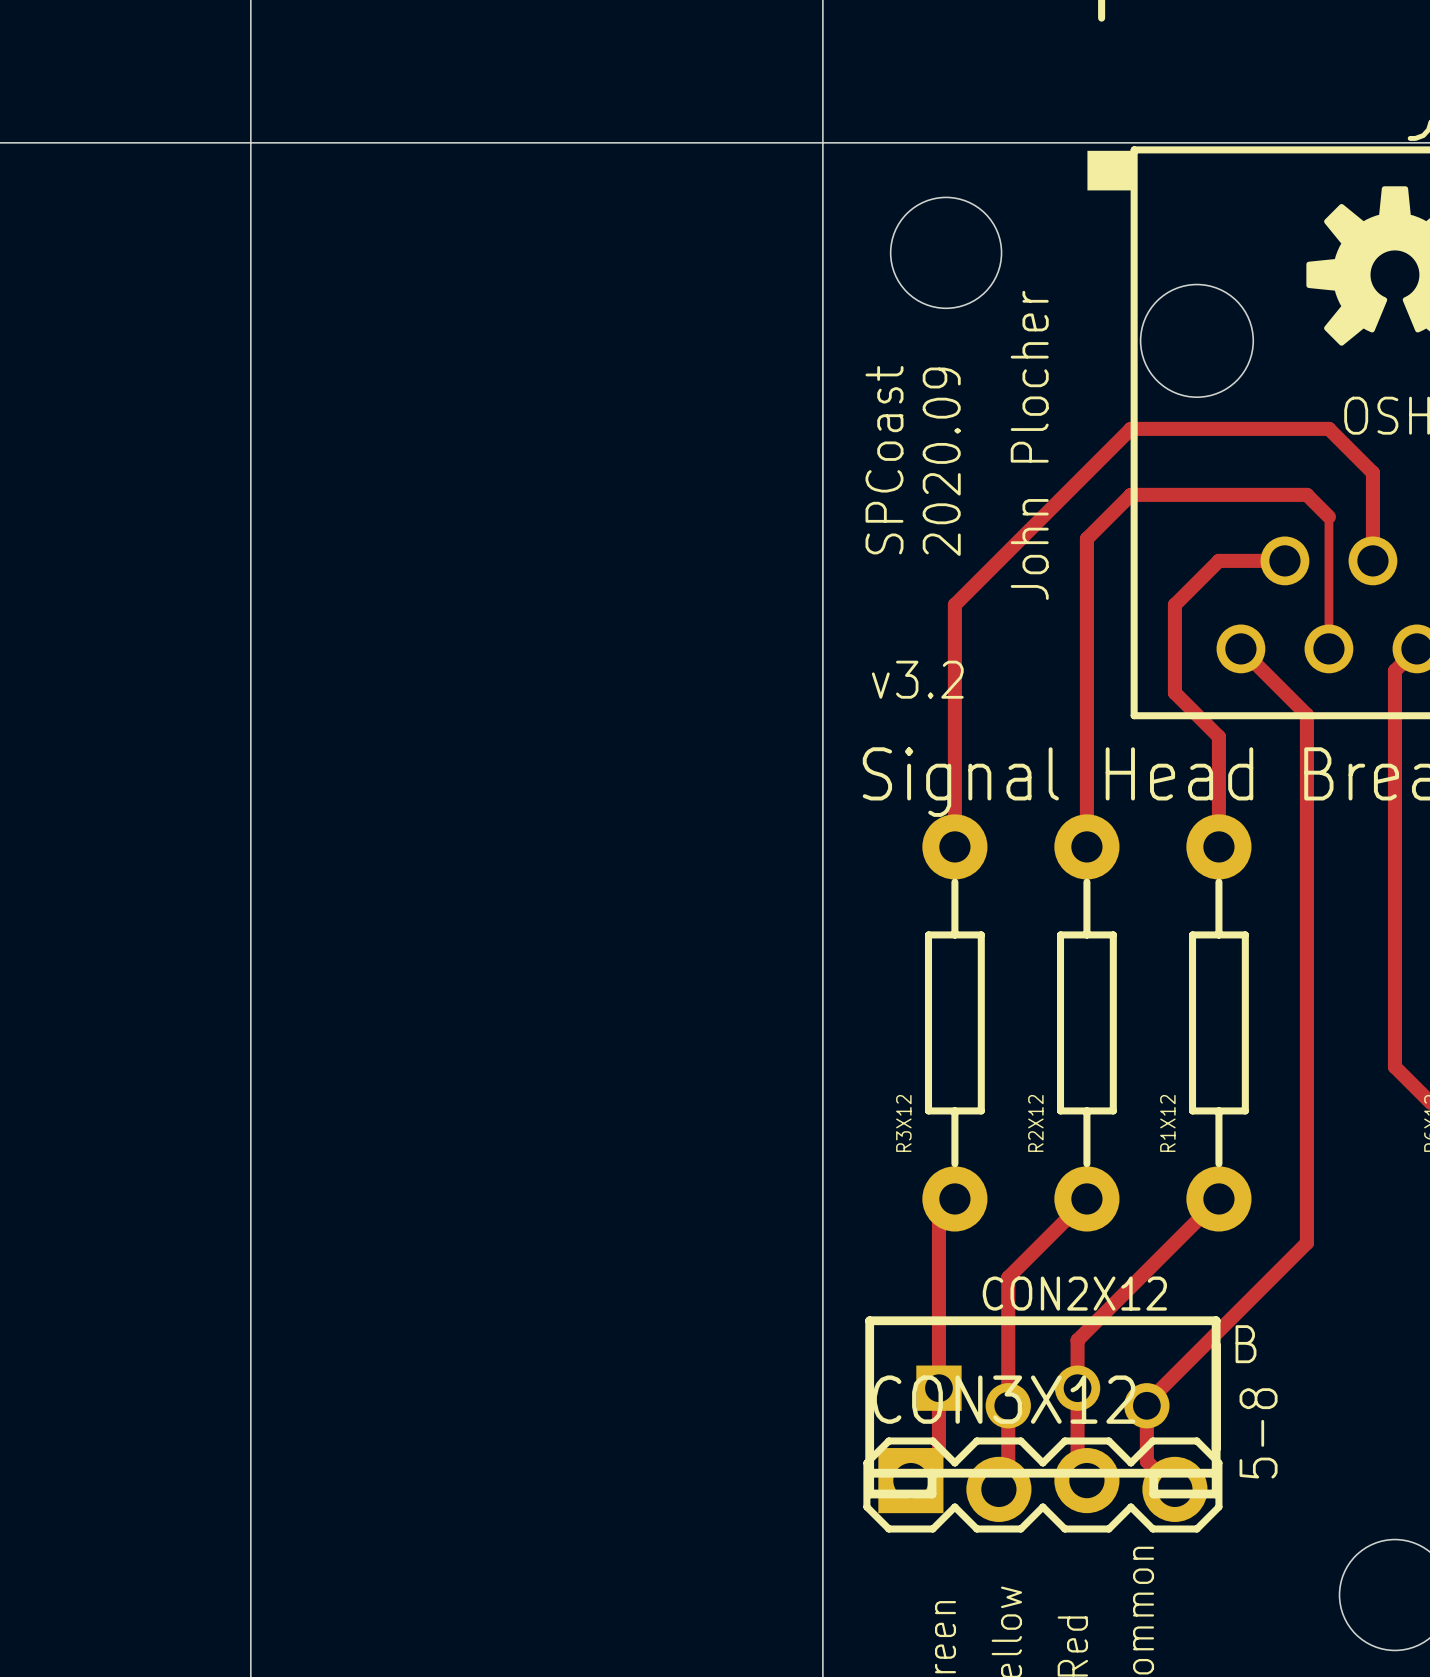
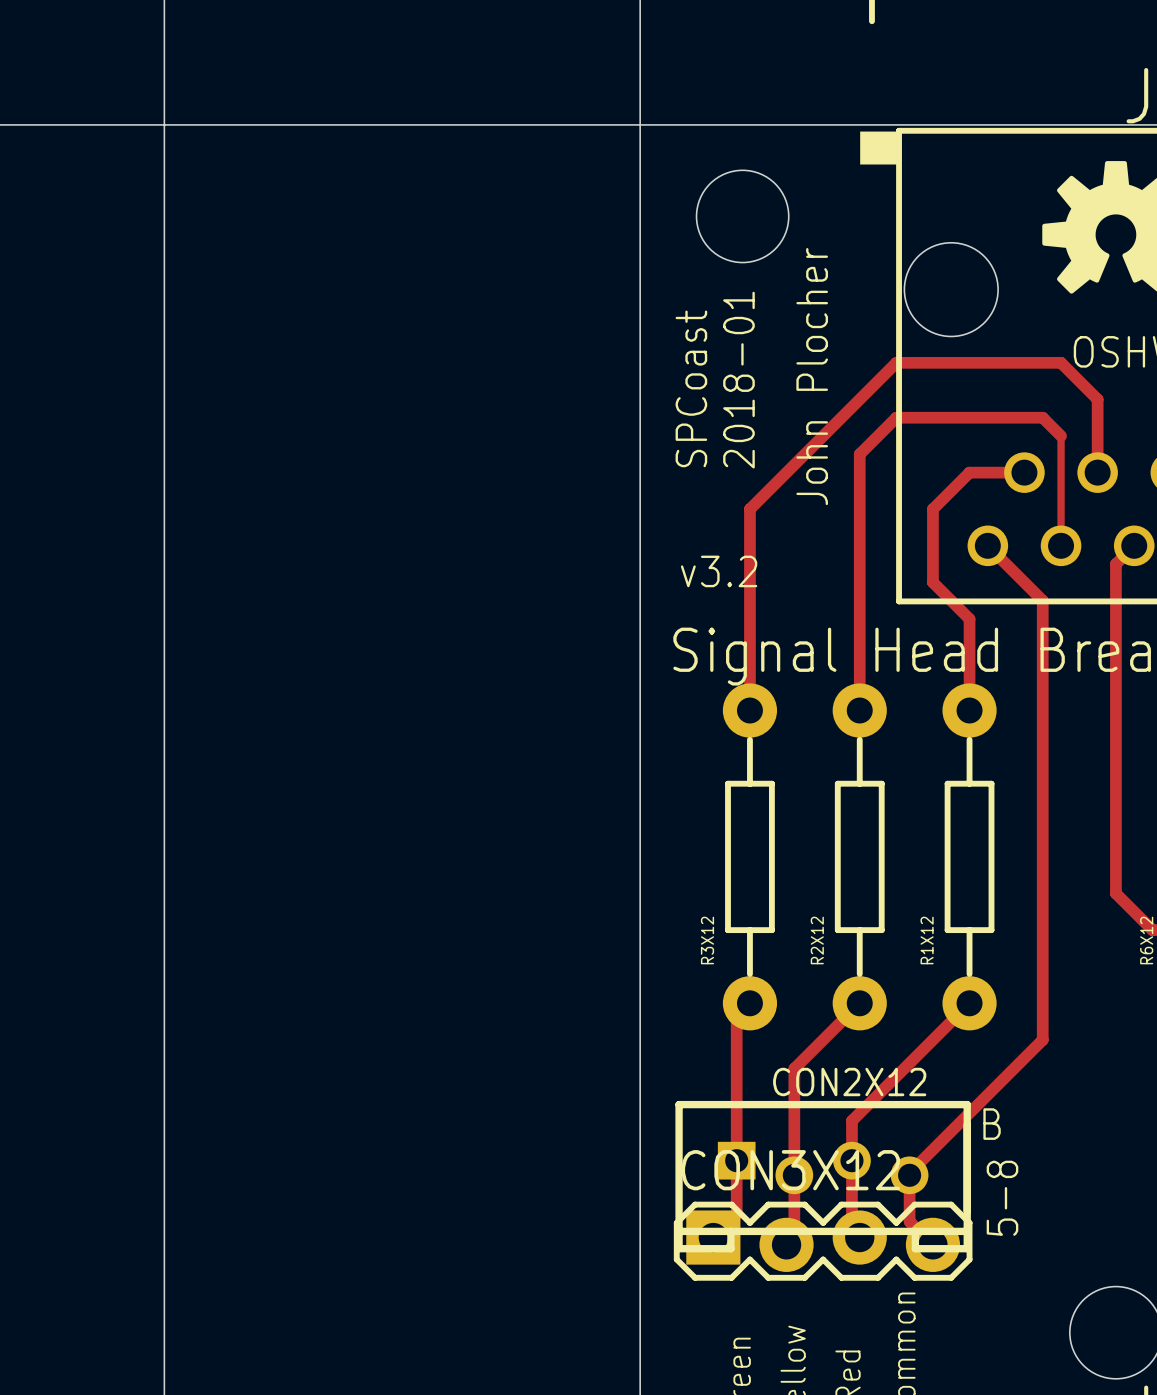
text: 2020.09 (941, 461) -> 2018-01 (738, 380)

